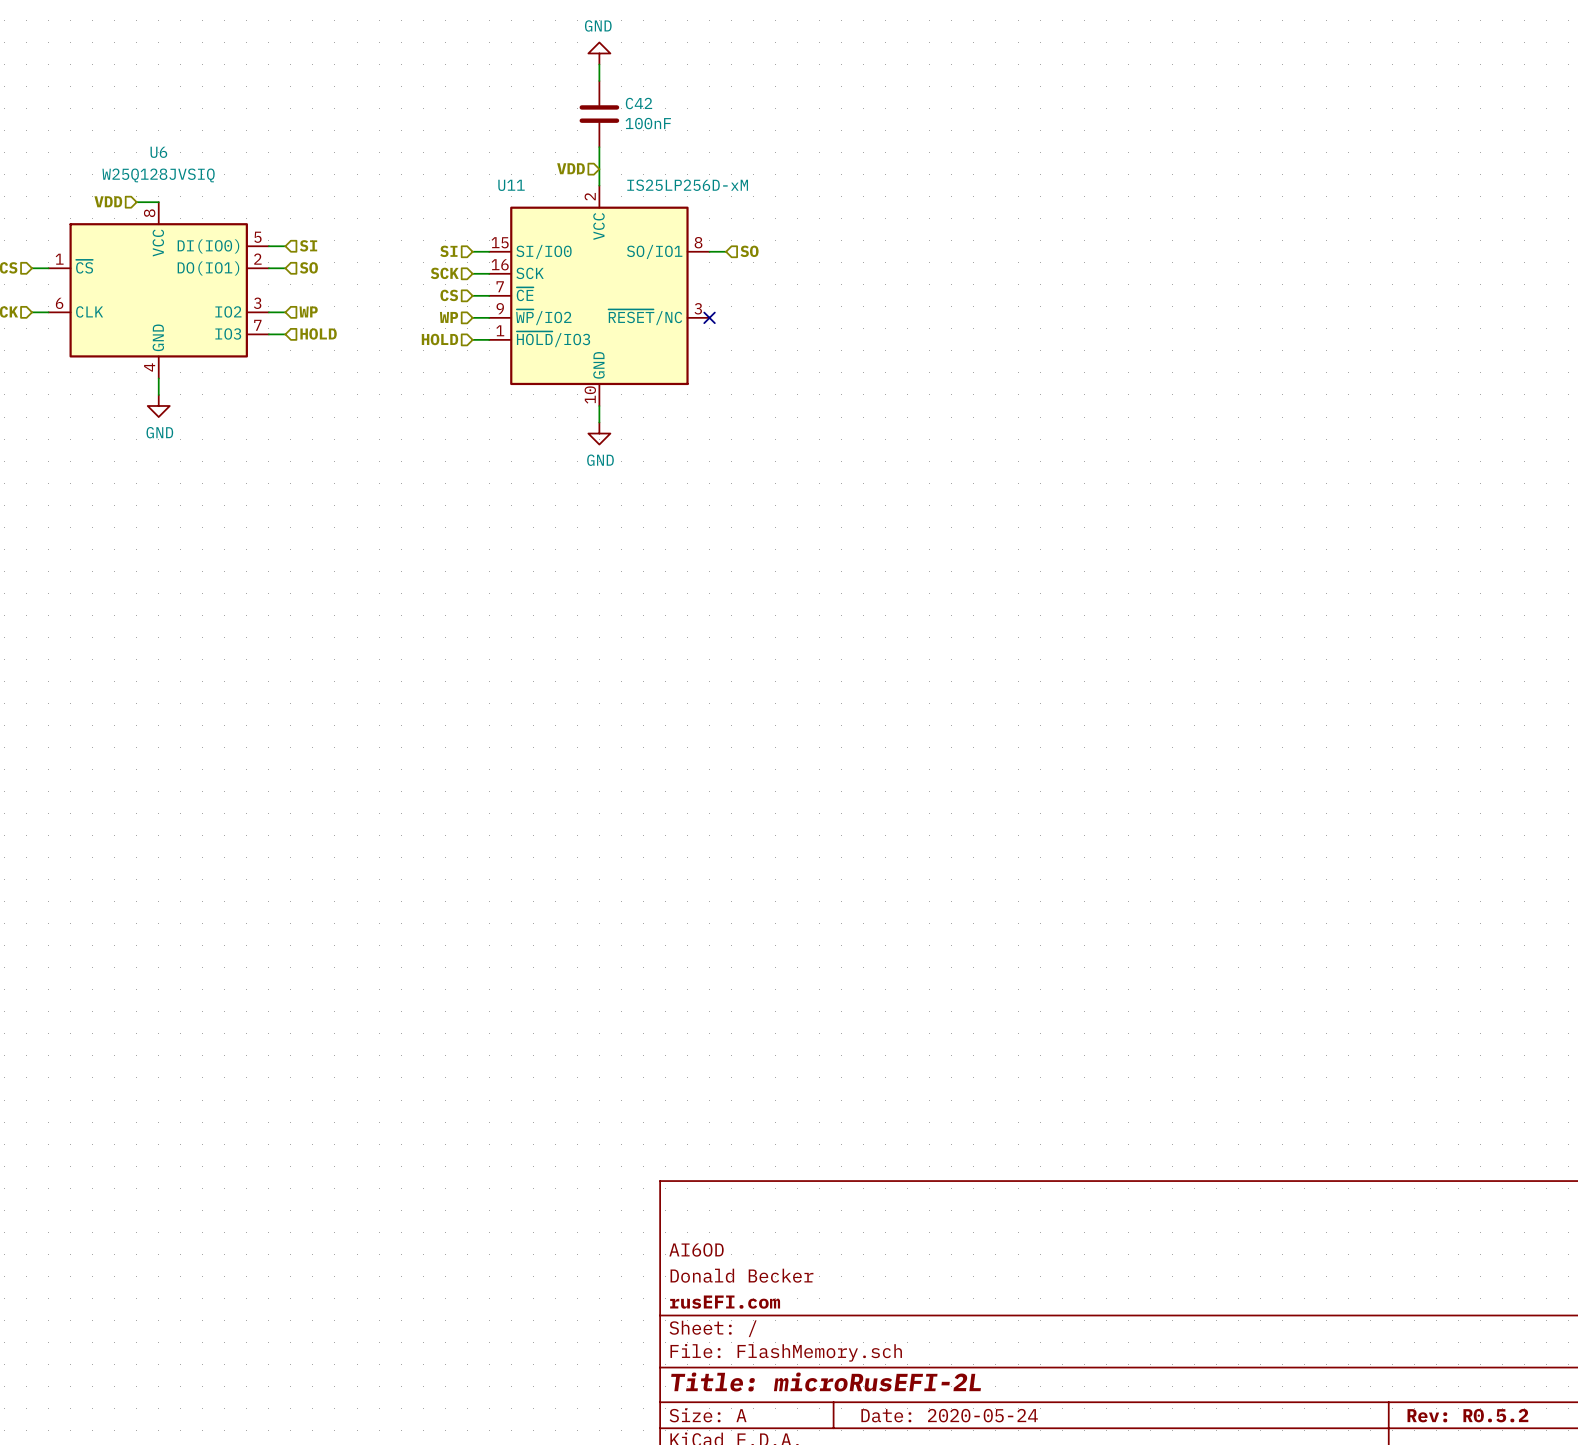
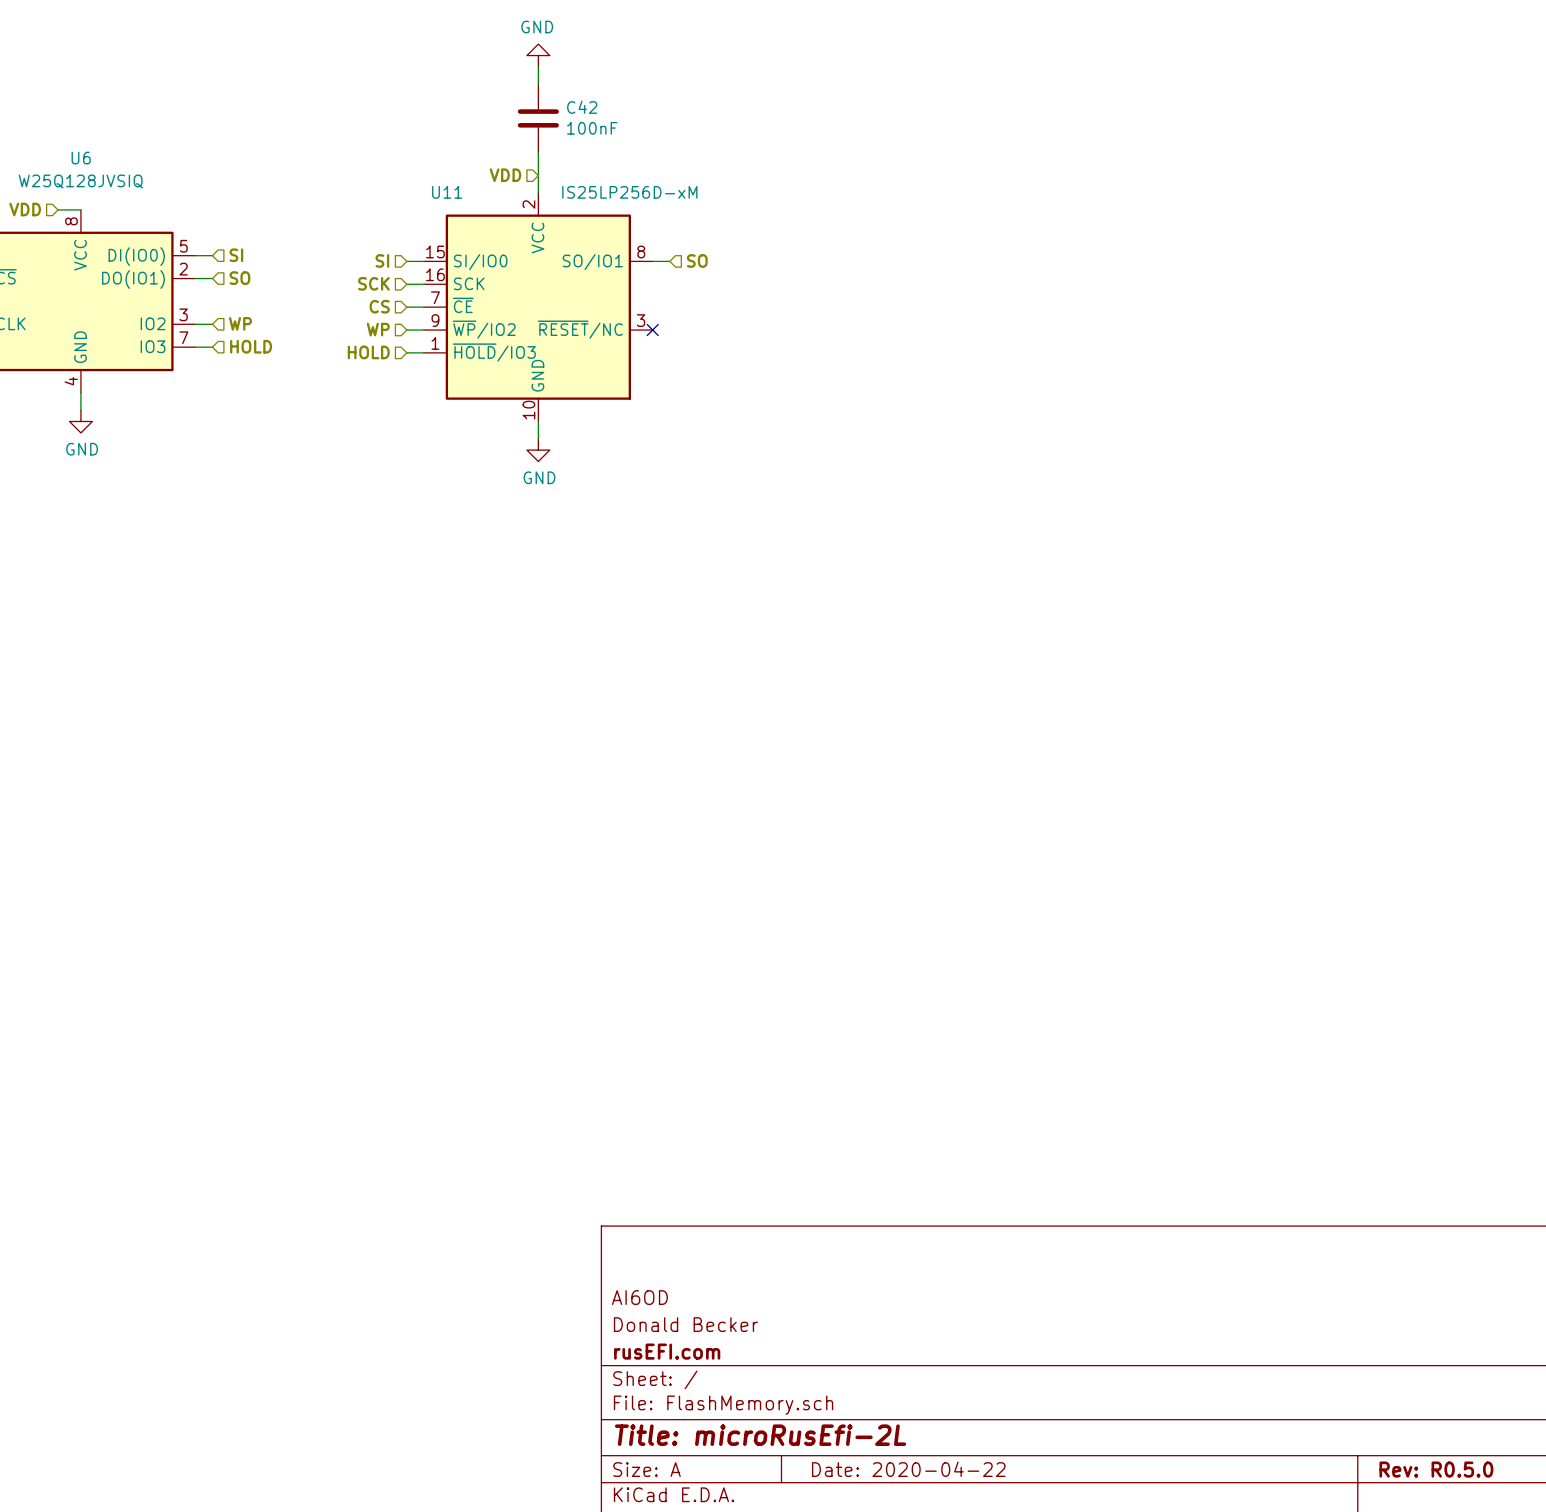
title block: Title: microRusEFI-2L (826, 1382) -> Title: microRusEfi-2L (760, 1435)
title block: Date: 2020-05-24 (949, 1415) -> Date: 2020-04-22 (908, 1469)
title block: Rev: R0.5.2 (1467, 1415) -> Rev: R0.5.0 (1436, 1469)

